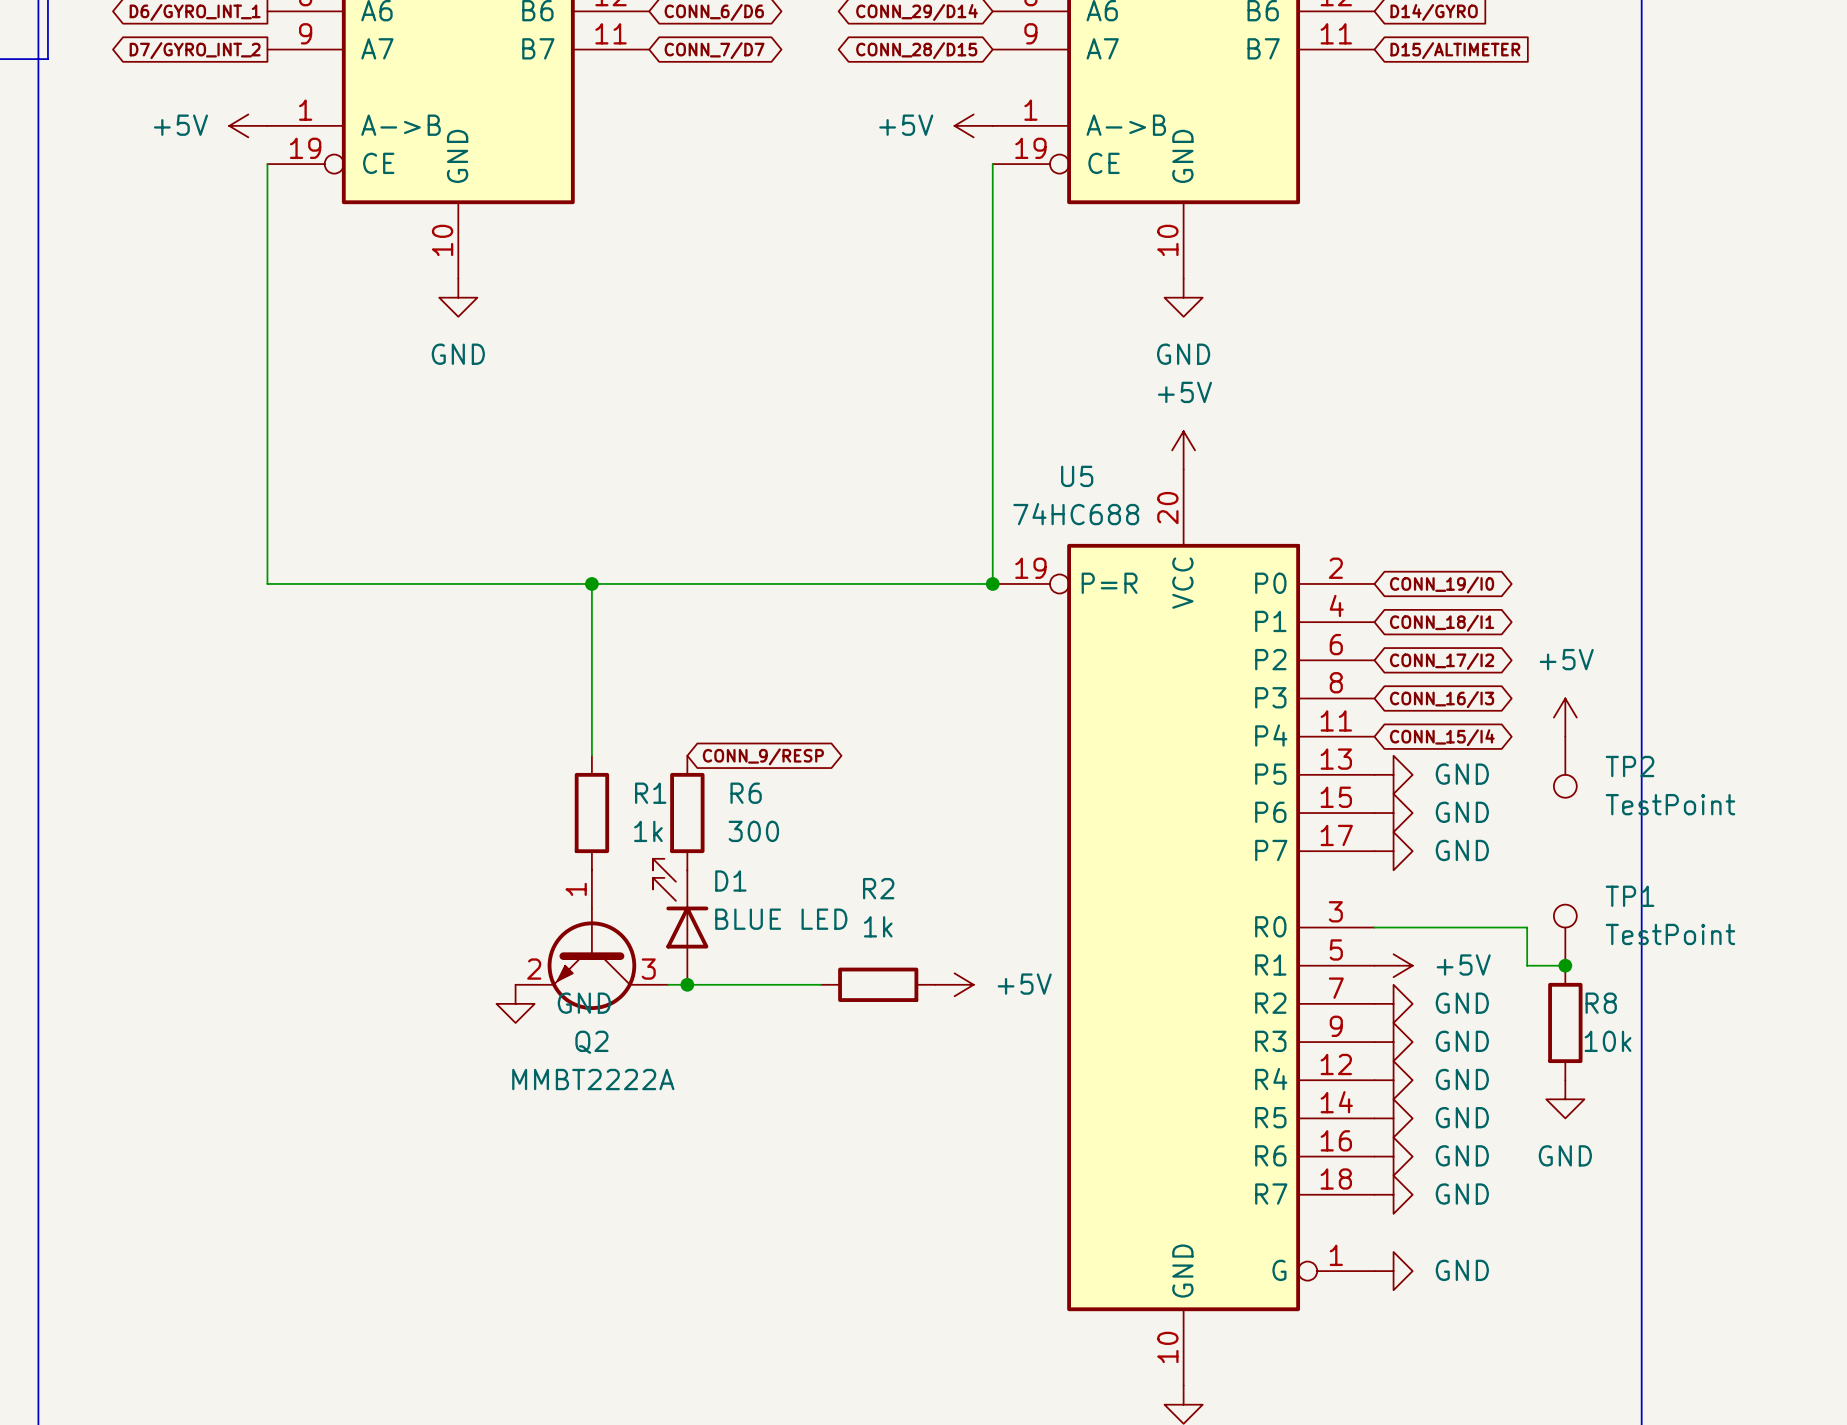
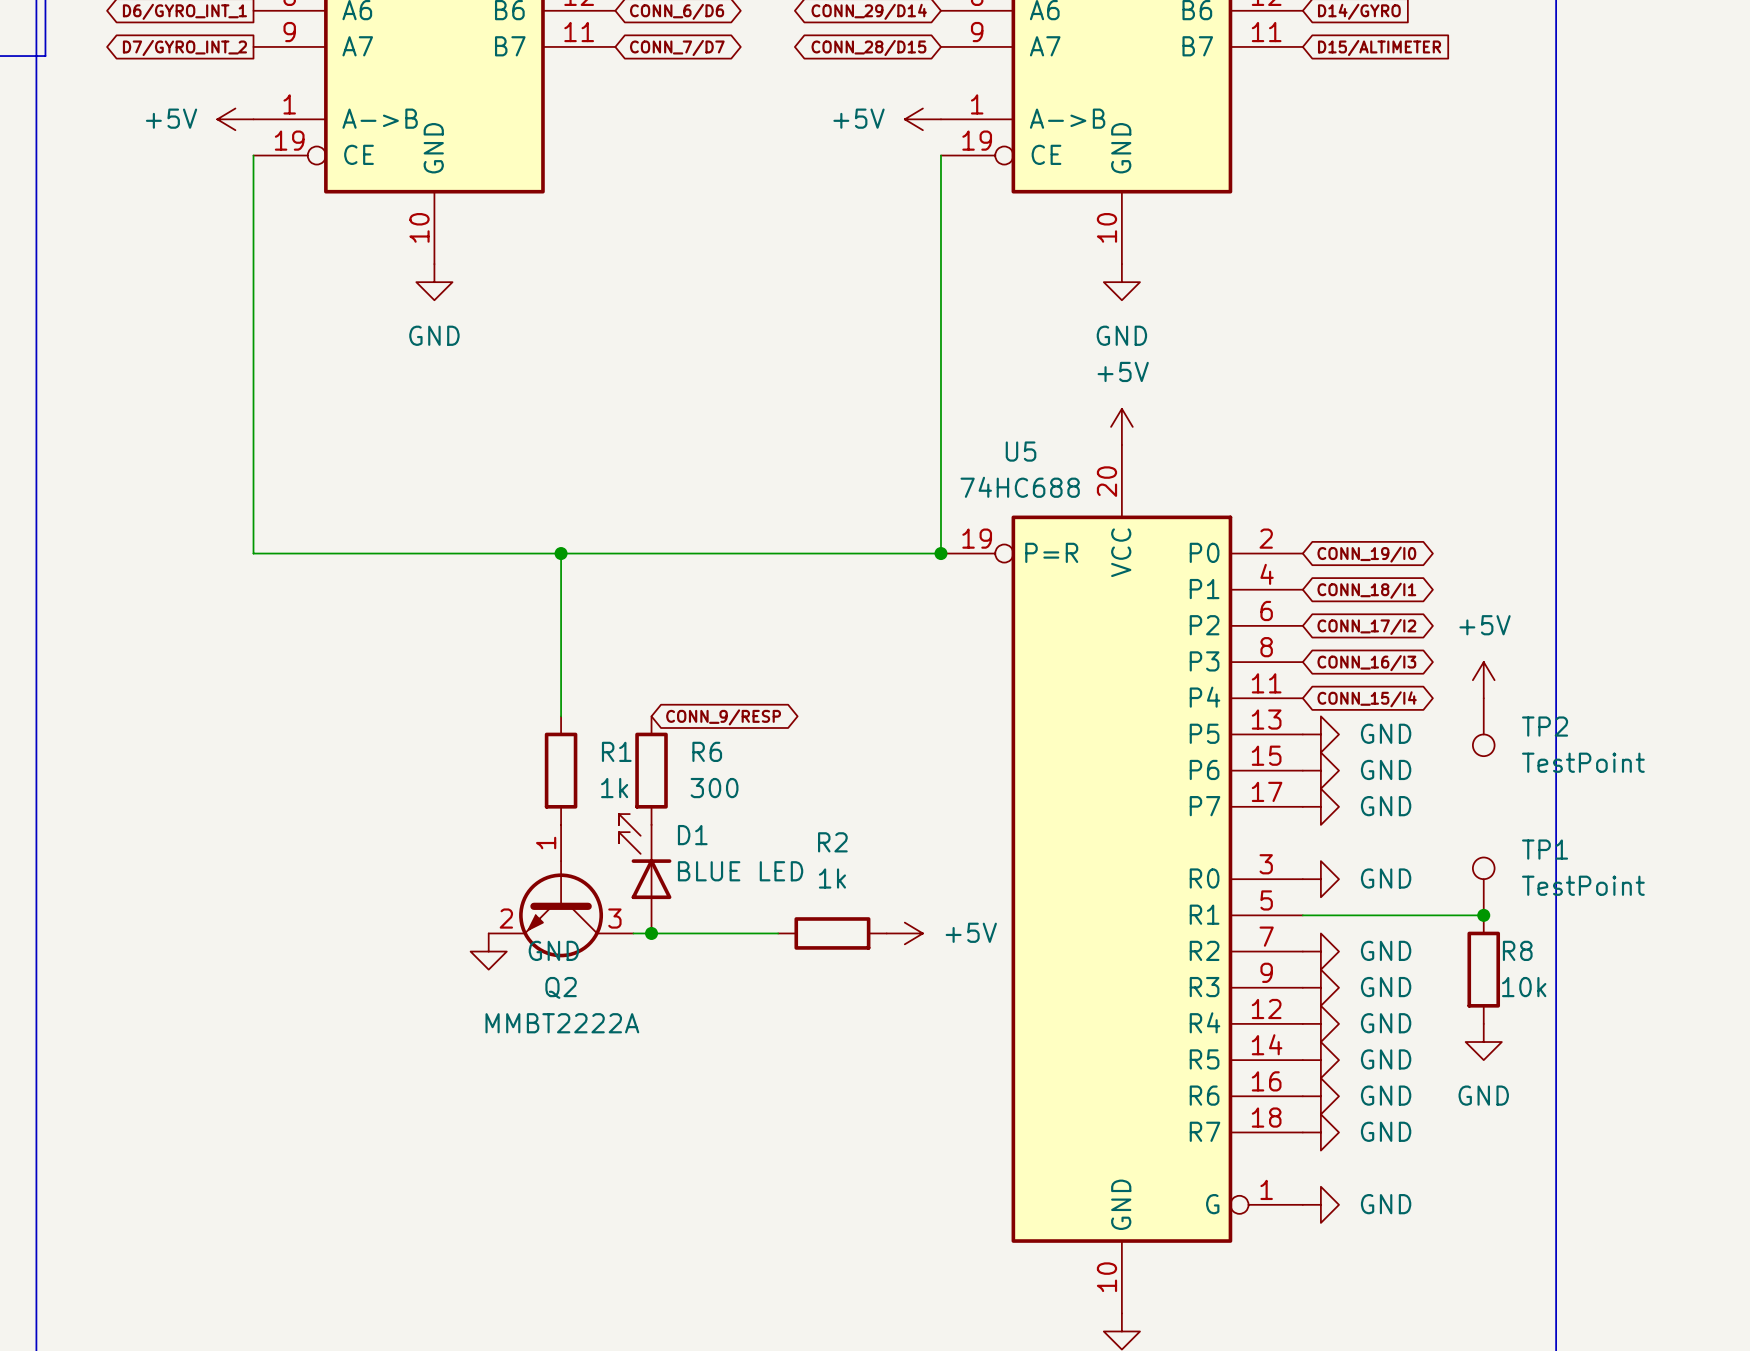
wire: (1374, 927) (1527, 927) (1527, 965) -> (1302, 915) (1447, 915)
power symbol: none -> GND (1320, 879)
power symbol: +5V (1393, 965) -> none

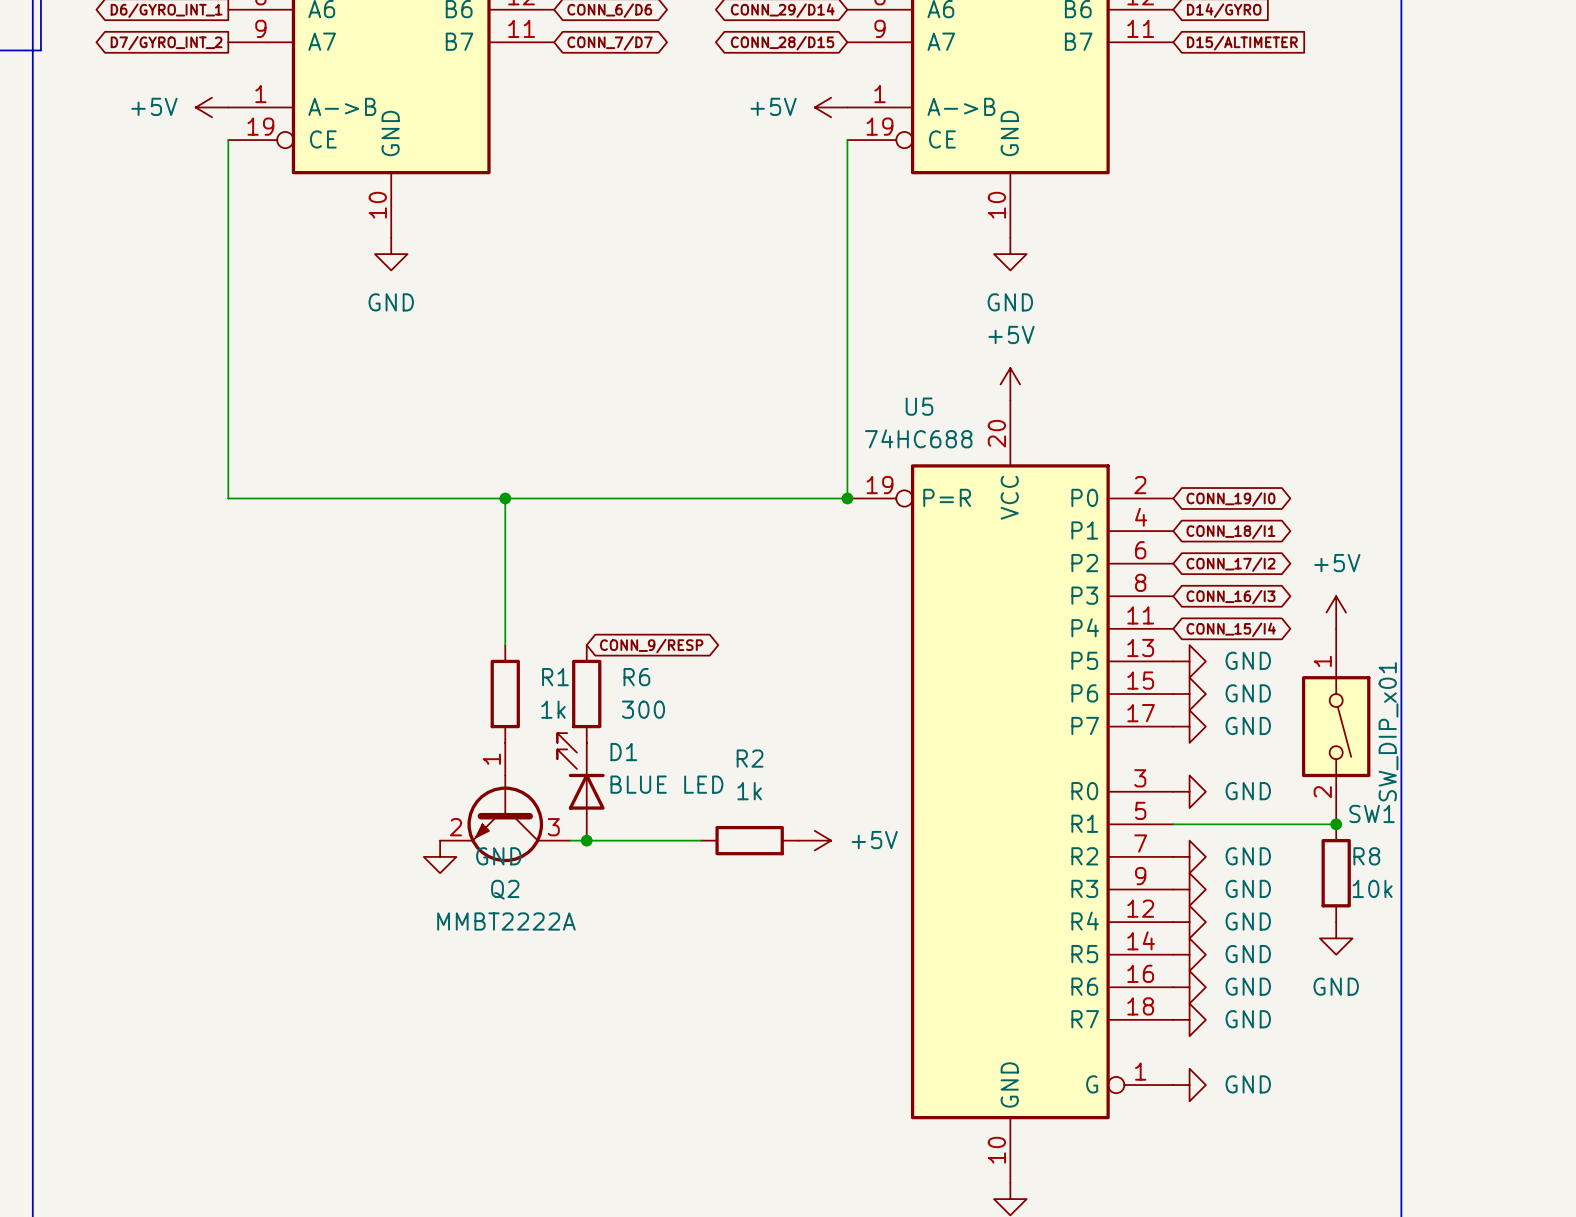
TP2: TestPoint (1483, 727) -> none
SW1: none -> SW_DIP_x01 (1336, 726)
TP1: TestPoint (1483, 886) -> none

